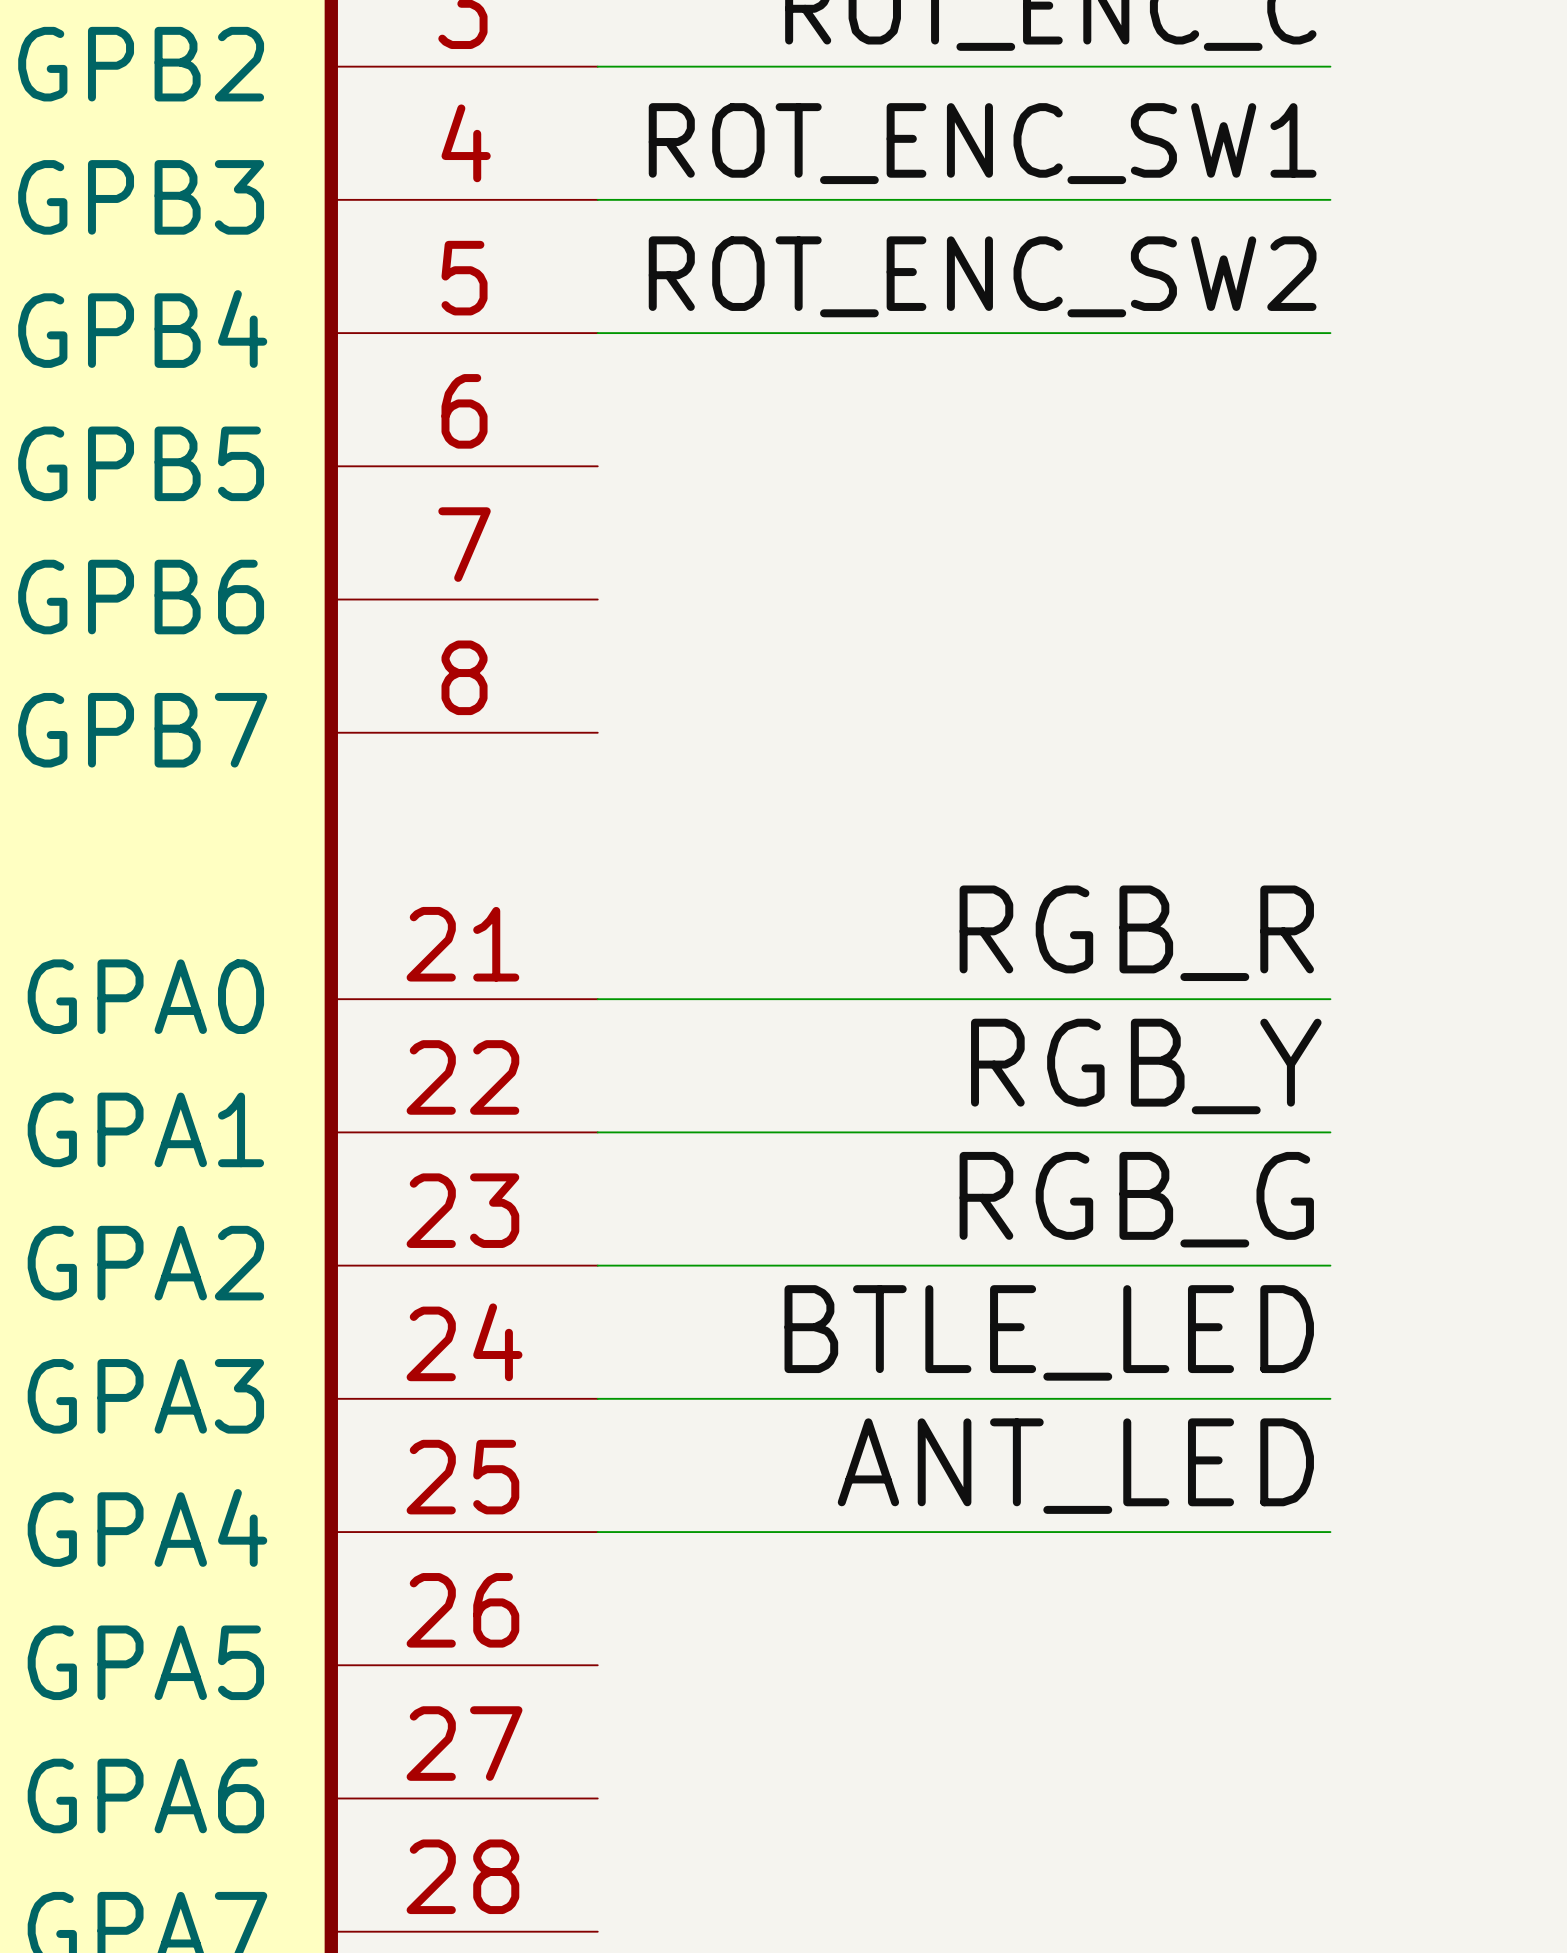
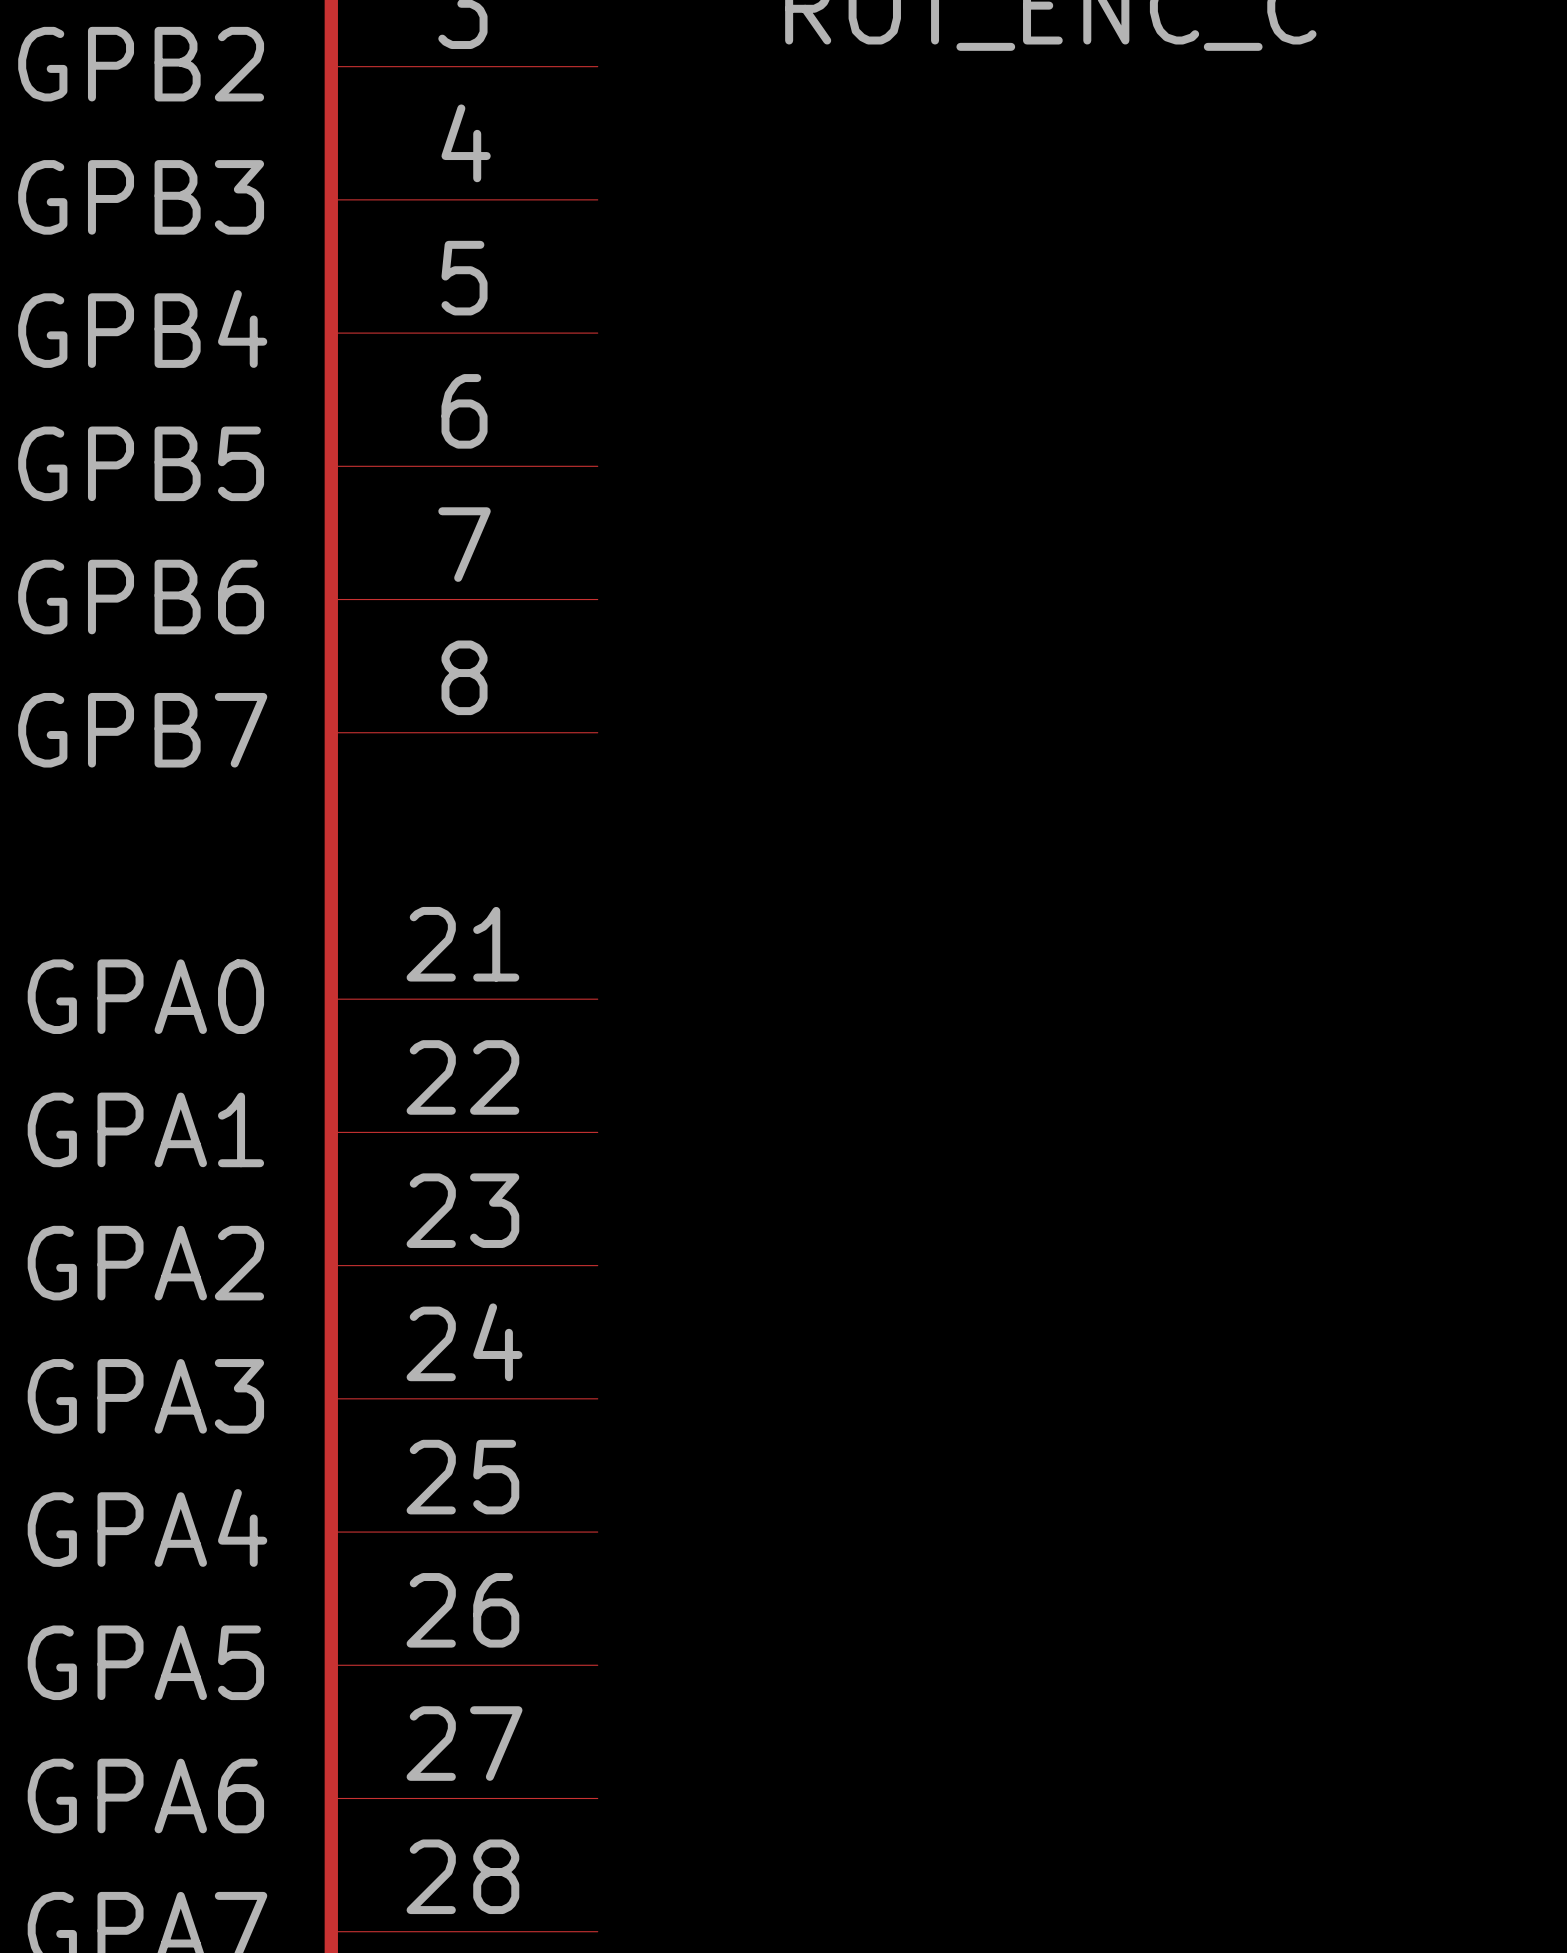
wire: (597, 66) (1330, 66) -> none
label: ROT_ENC_SW1 (982, 143) -> none
wire: (597, 199) (1330, 199) -> none
label: ROT_ENC_SW2 (982, 276) -> none
wire: (597, 333) (1330, 333) -> none
label: RGB_R (1136, 933) -> none
wire: (597, 999) (1330, 999) -> none
label: RGB_Y (1146, 1066) -> none
wire: (597, 1132) (1330, 1132) -> none
label: RGB_G (1136, 1199) -> none
wire: (597, 1265) (1330, 1265) -> none
label: BTLE_LED (1049, 1332) -> none
wire: (597, 1398) (1330, 1398) -> none
label: ANT_LED (1075, 1466) -> none
wire: (597, 1532) (1330, 1532) -> none

